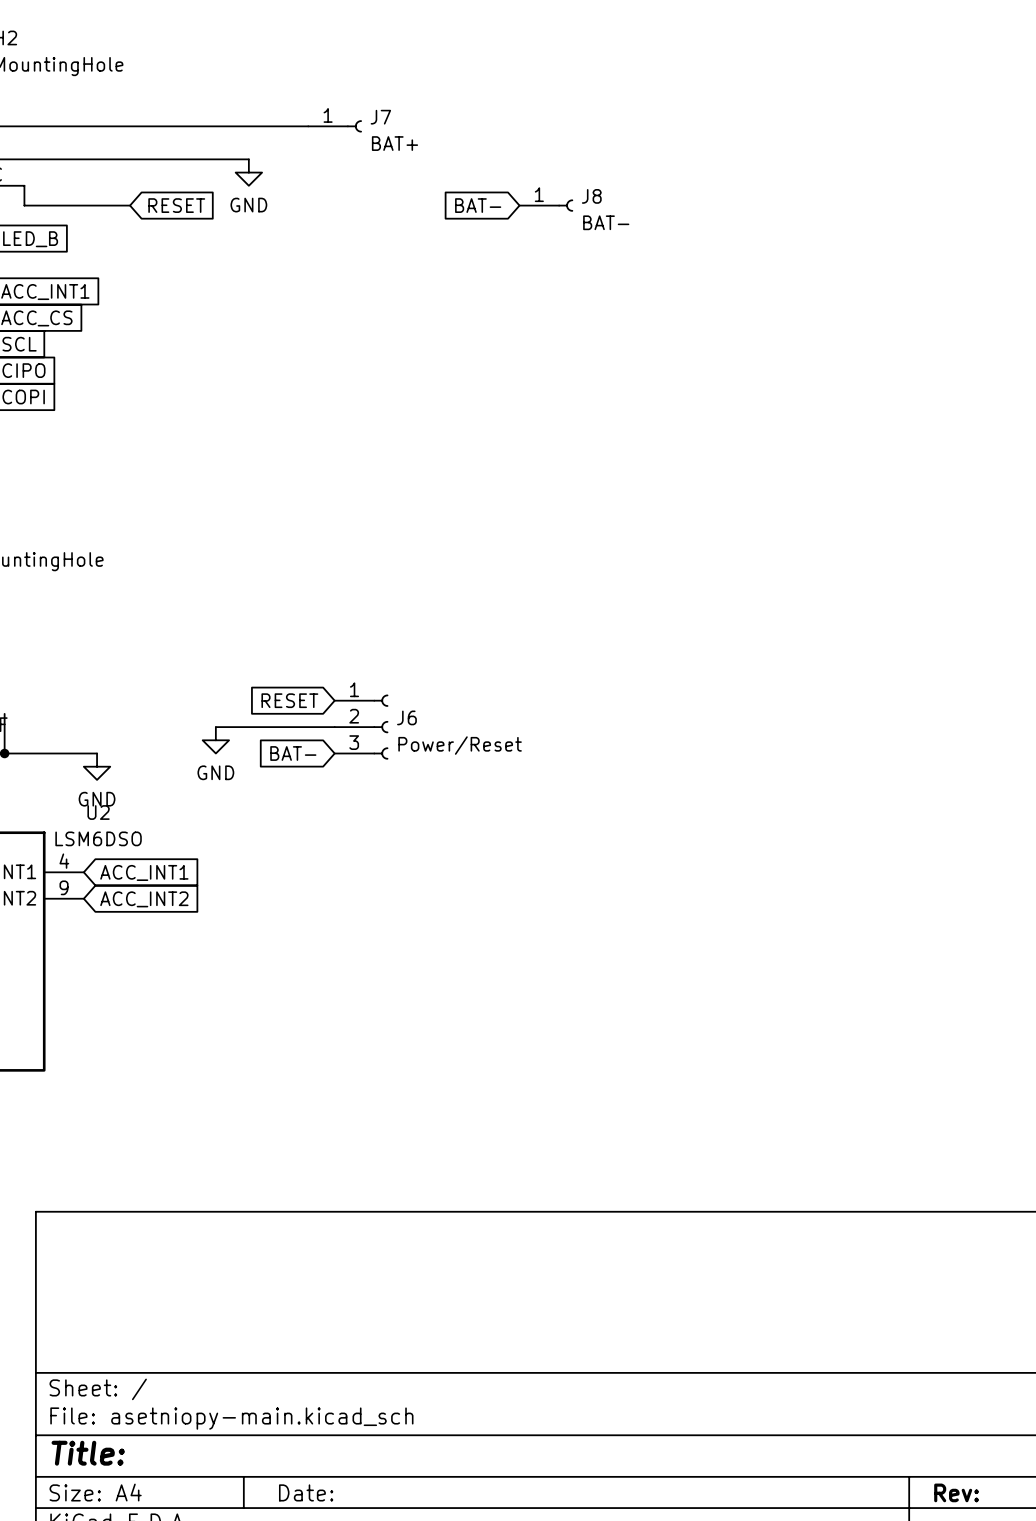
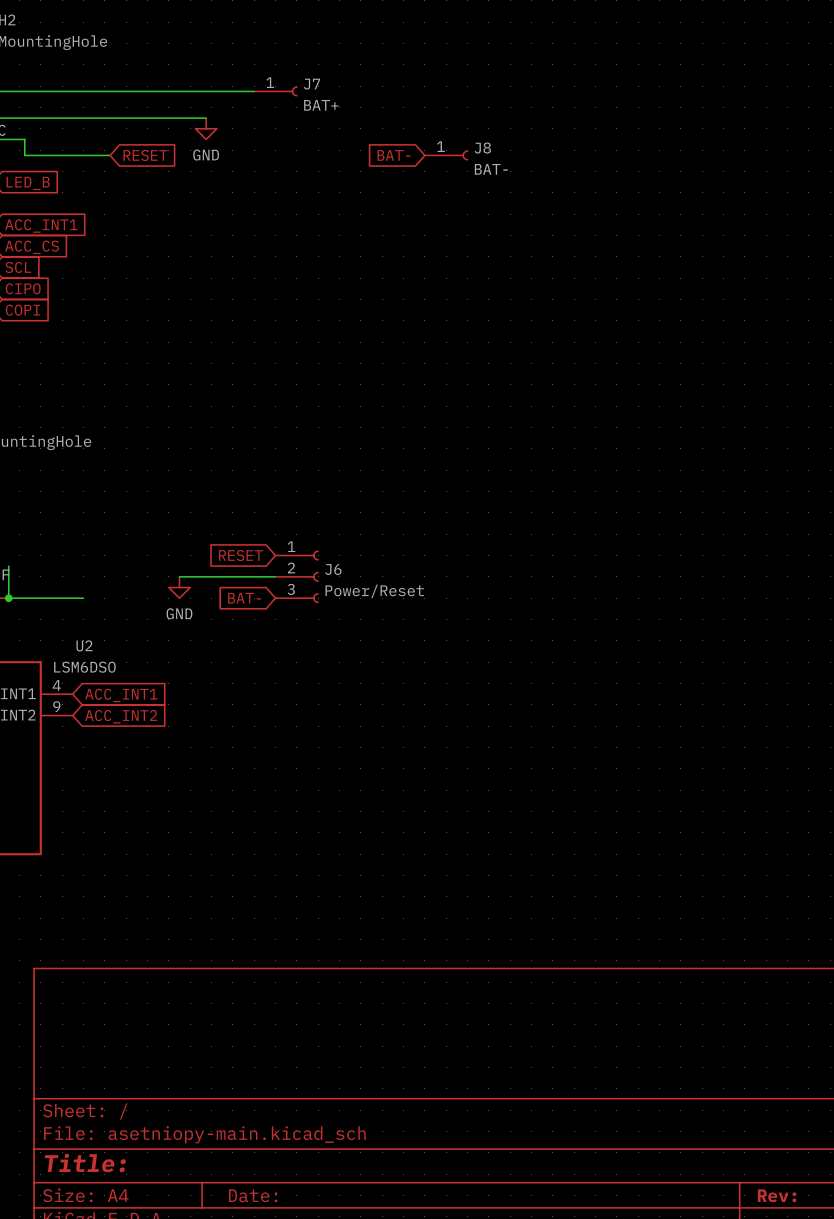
power symbol: GND (97, 766) -> none

